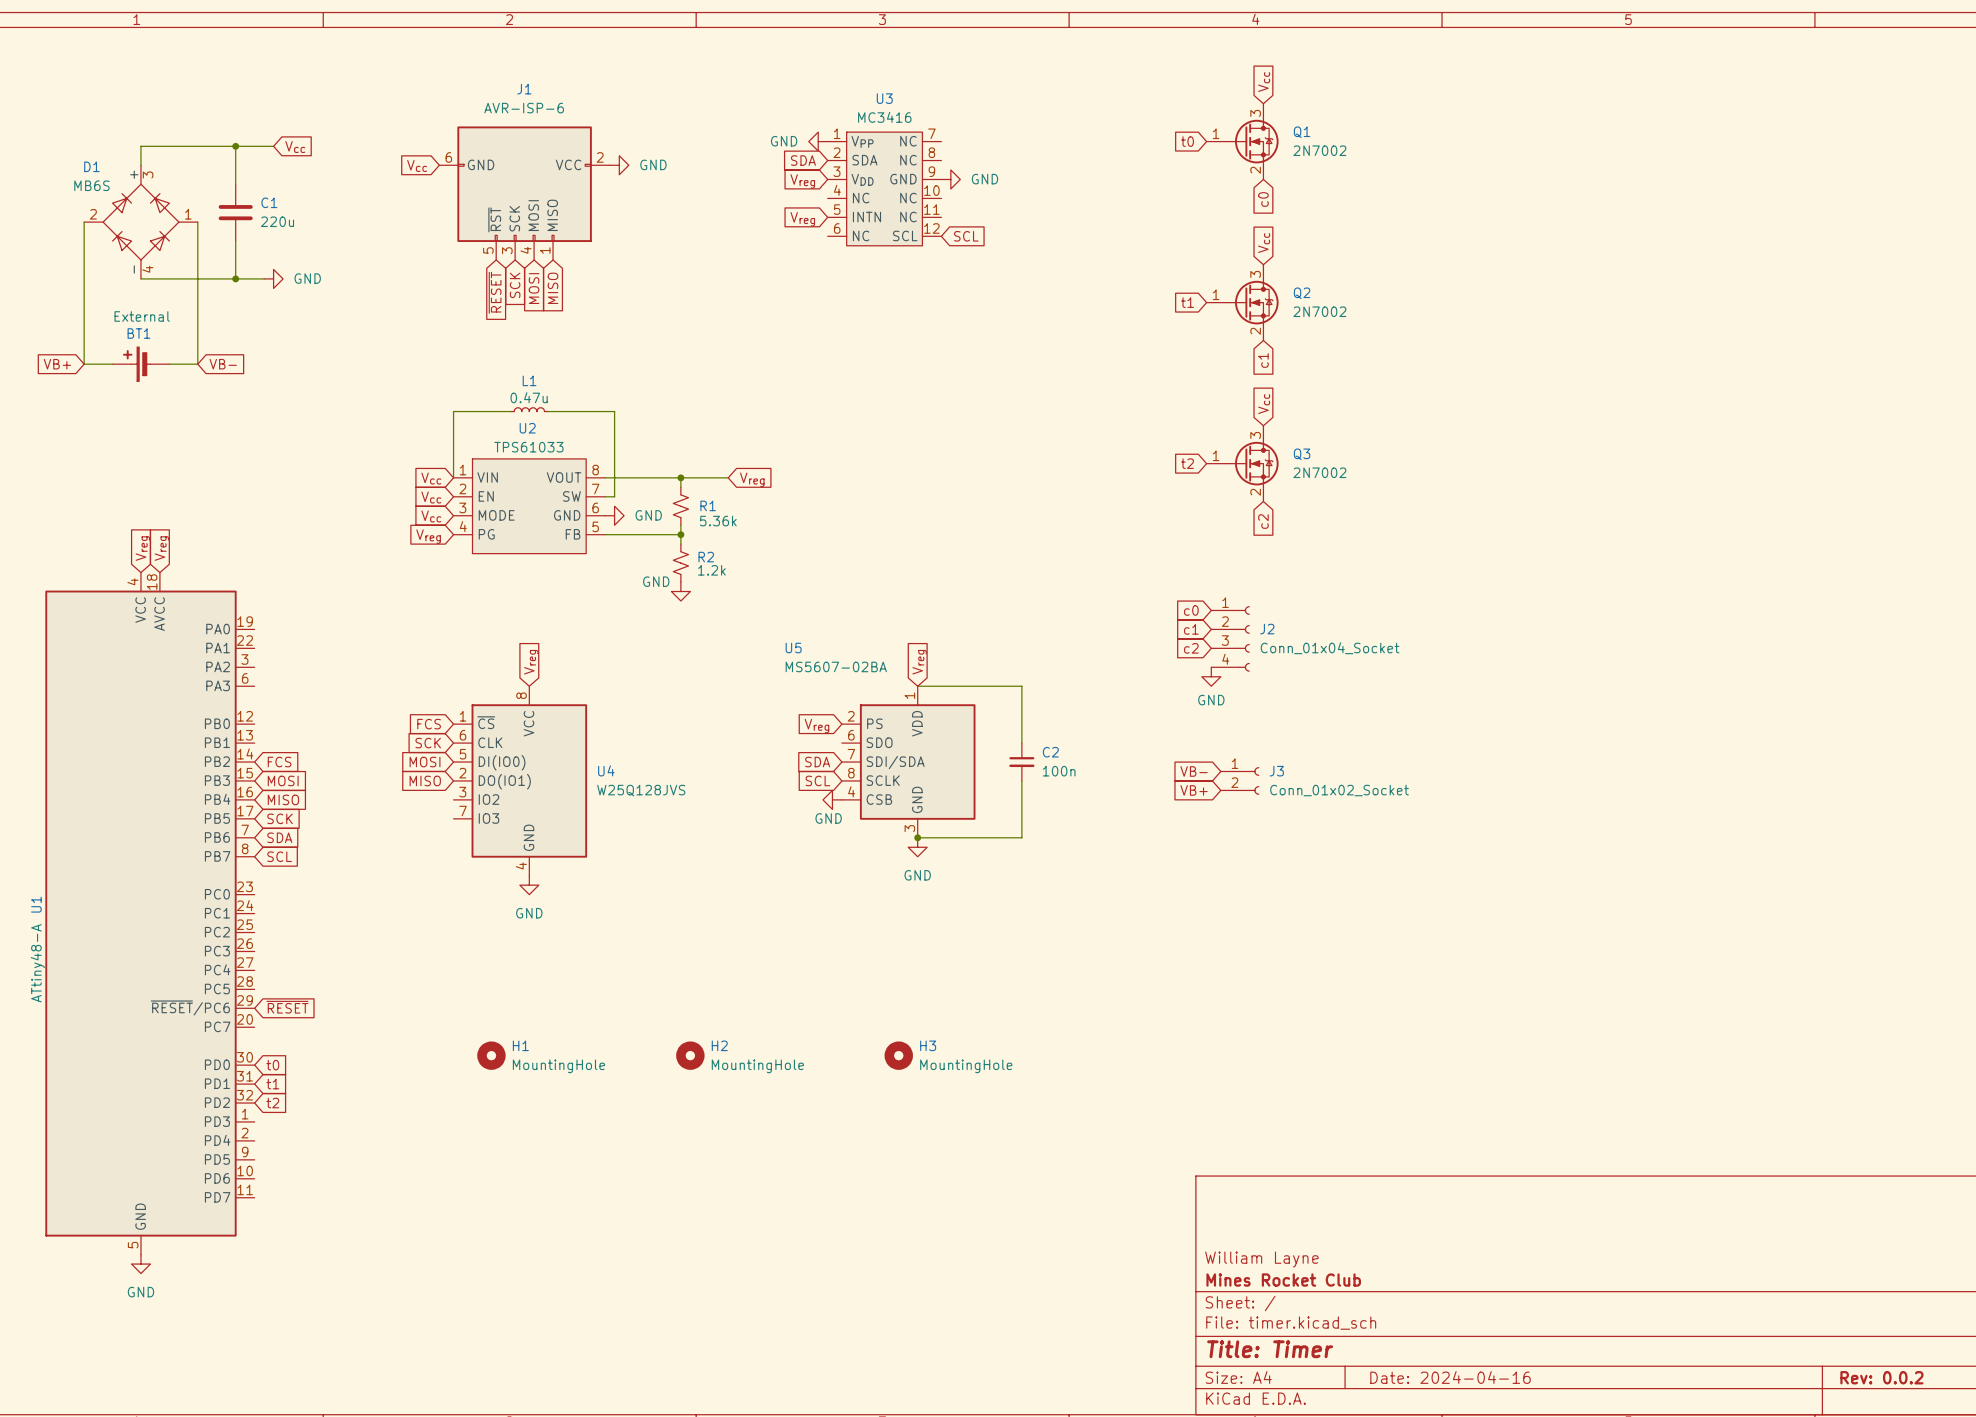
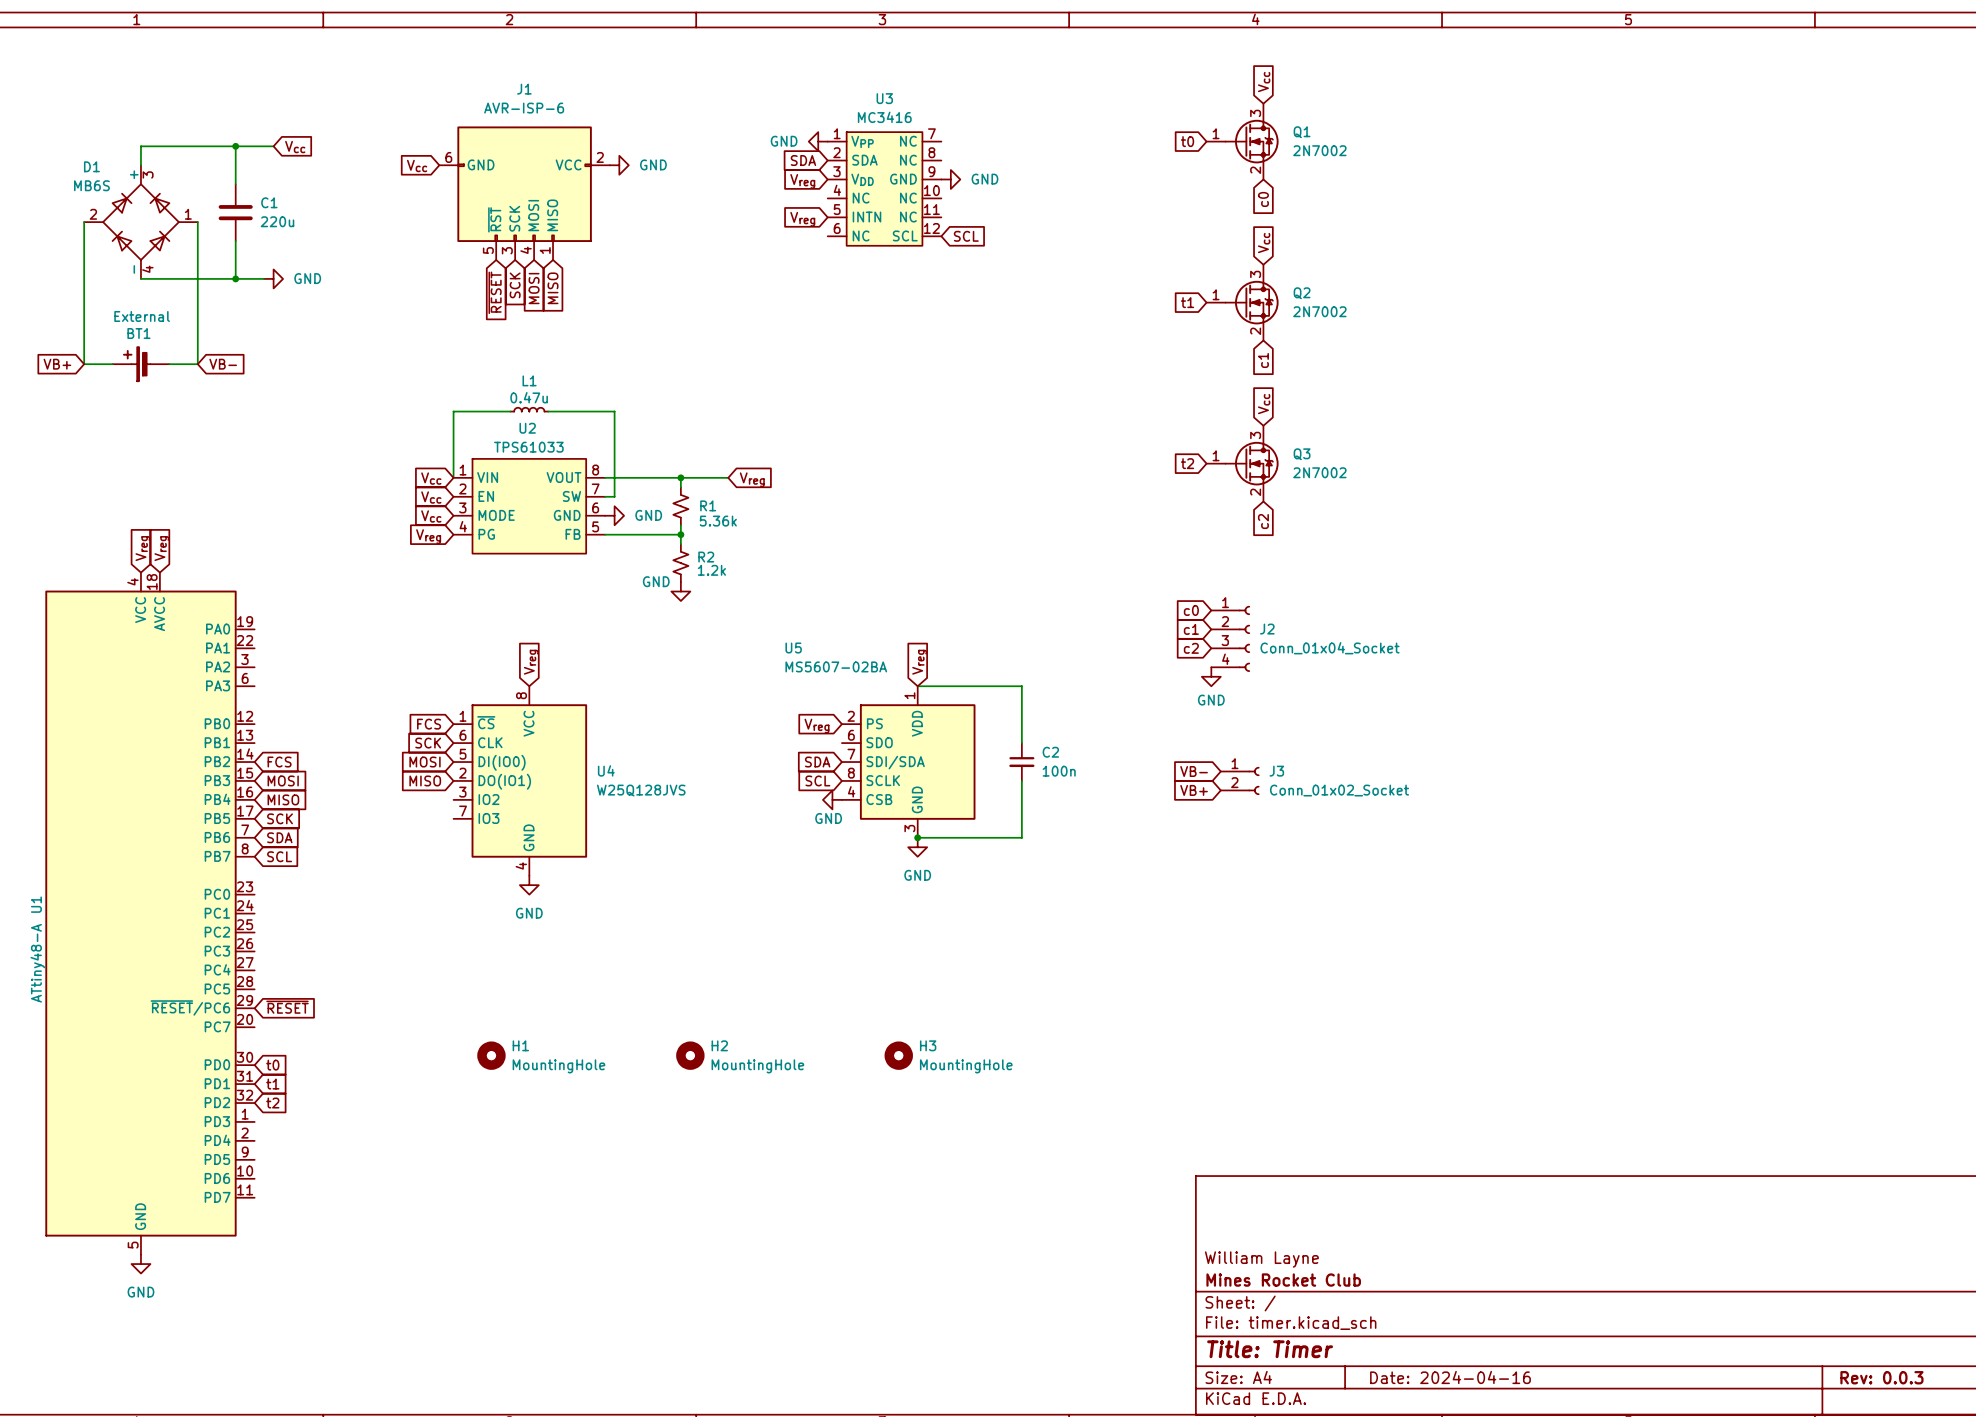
title block: Rev: 0.0.2 (1881, 1377) -> Rev: 0.0.3 (1881, 1377)

